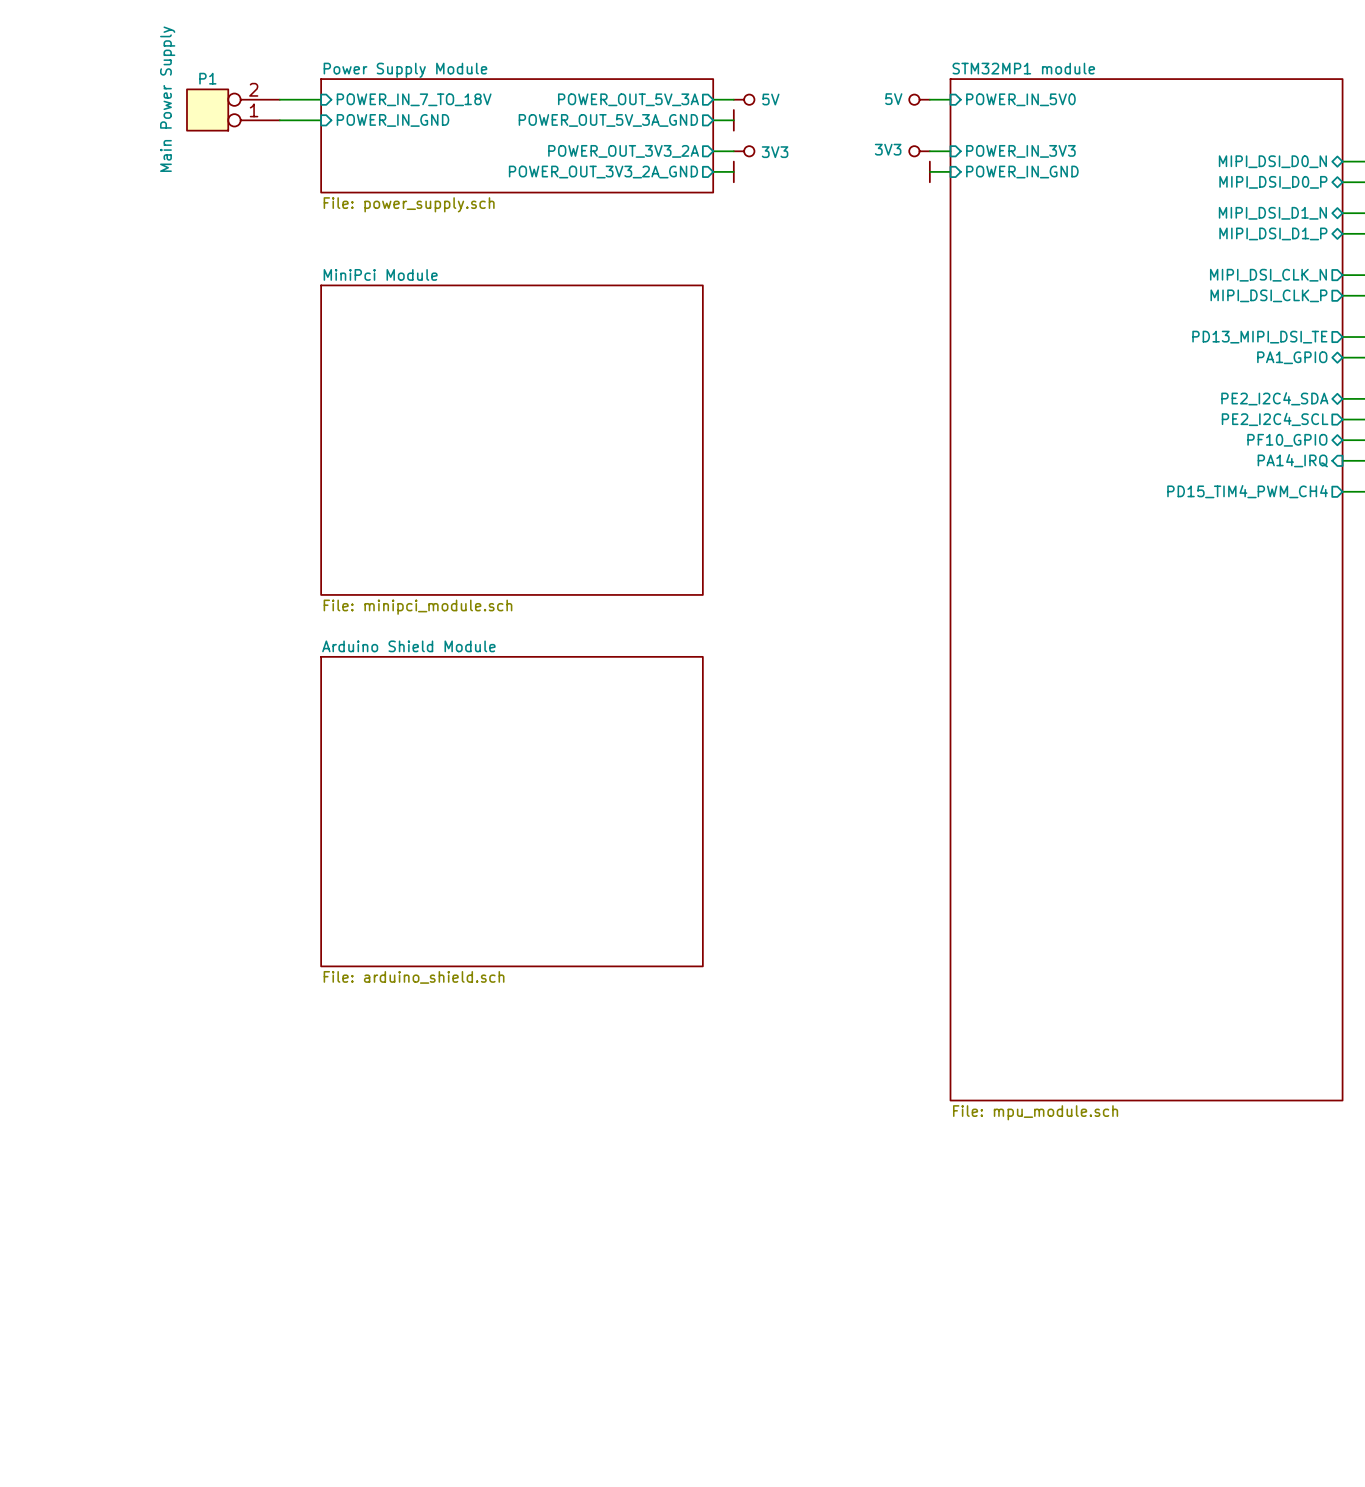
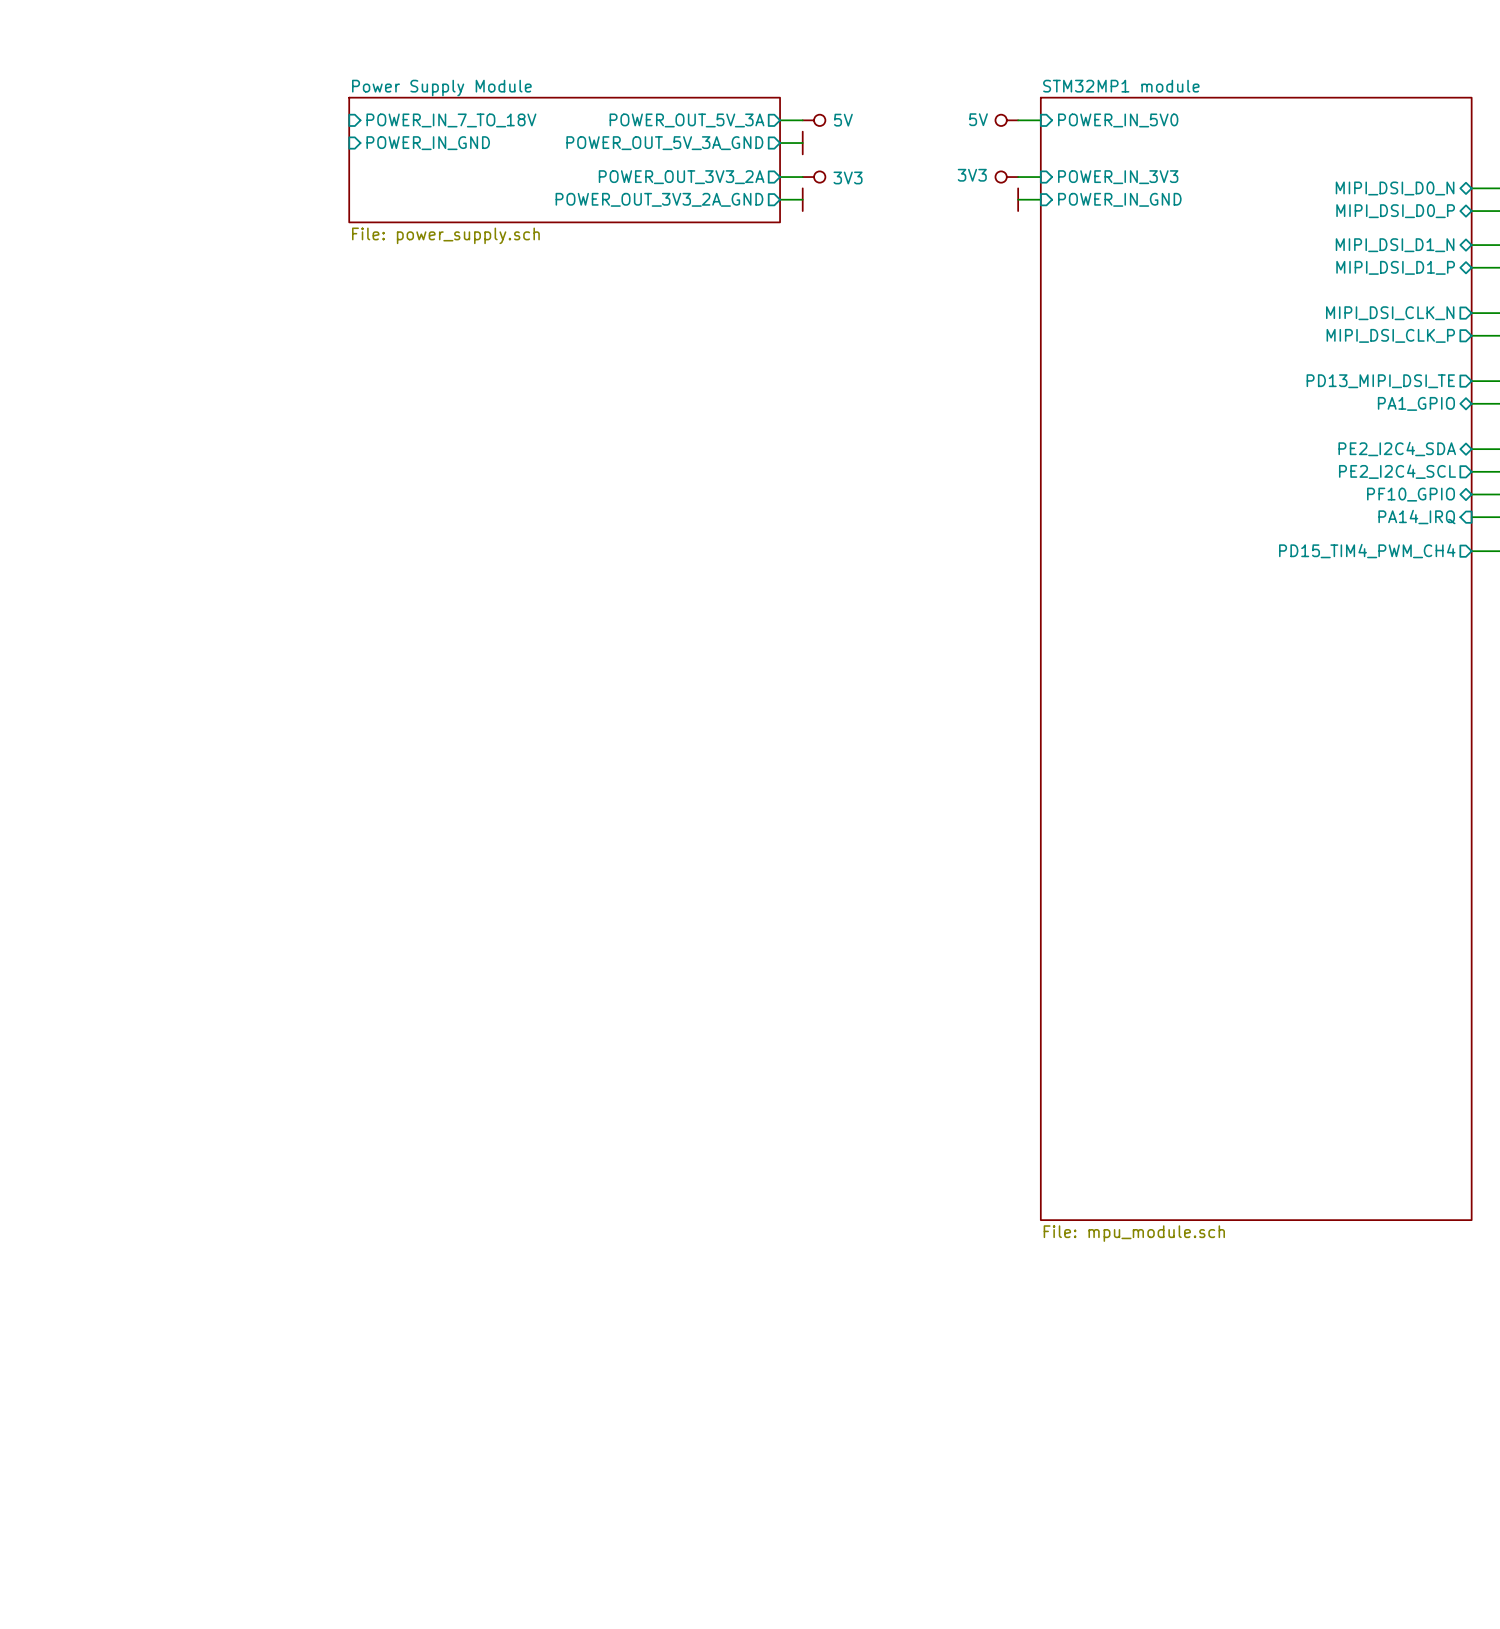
wire: (279, 99) (321, 99) -> none
P1: Main Power Supply (233, 110) -> none
wire: (279, 120) (321, 120) -> none
sheet MiniPci Module: File: minipci_module.sch (511, 440) -> none
sheet Arduino Shield Module: File: arduino_shield.sch (511, 811) -> none

